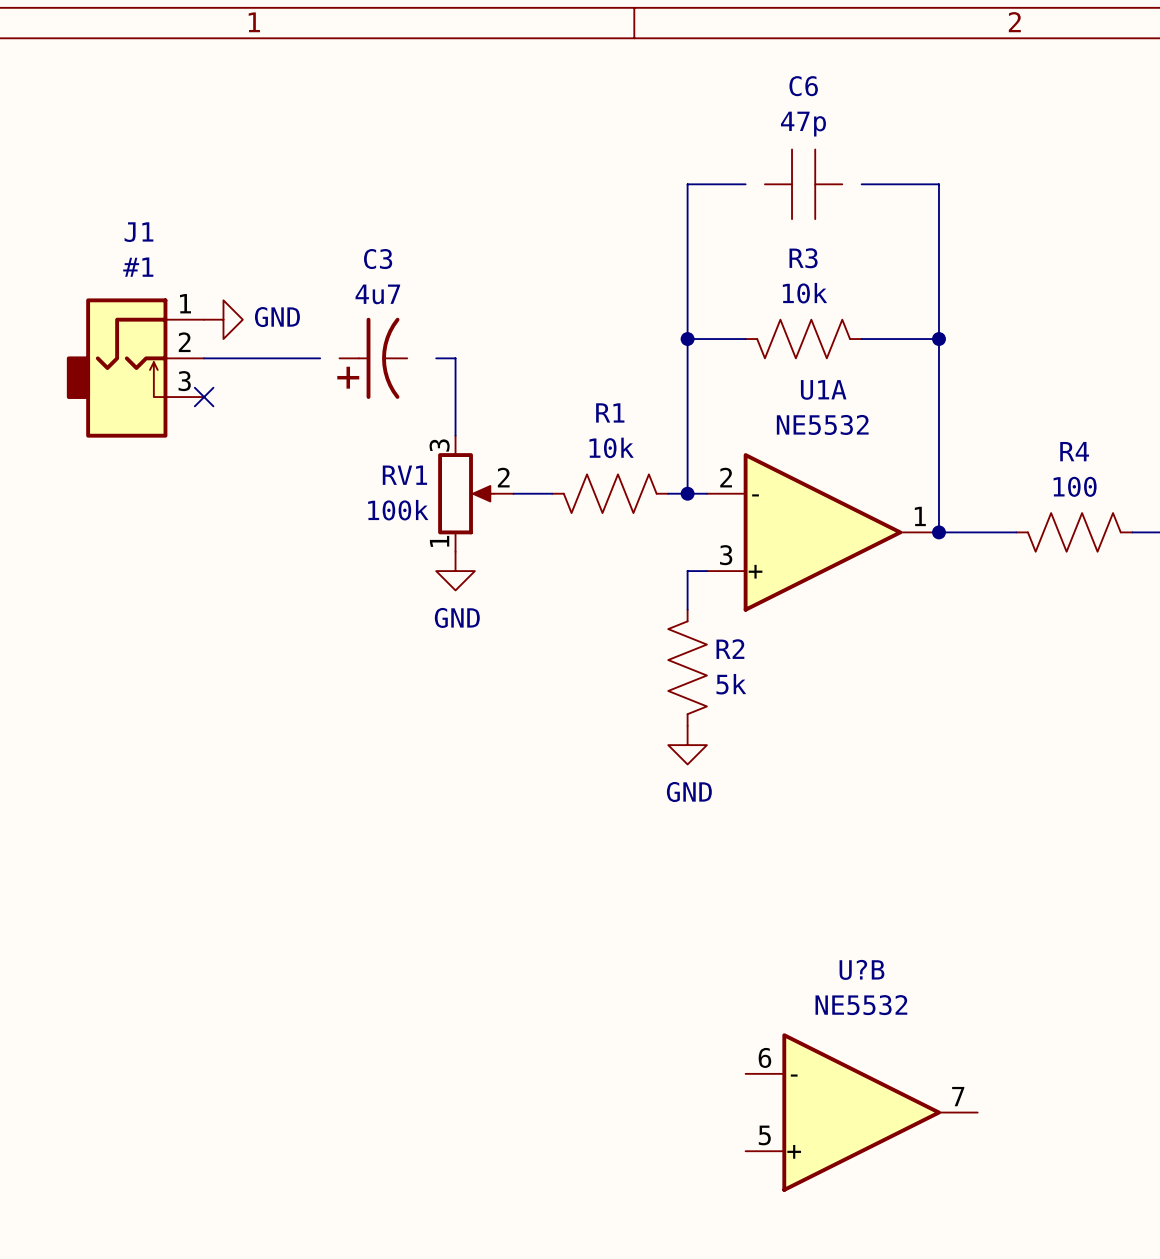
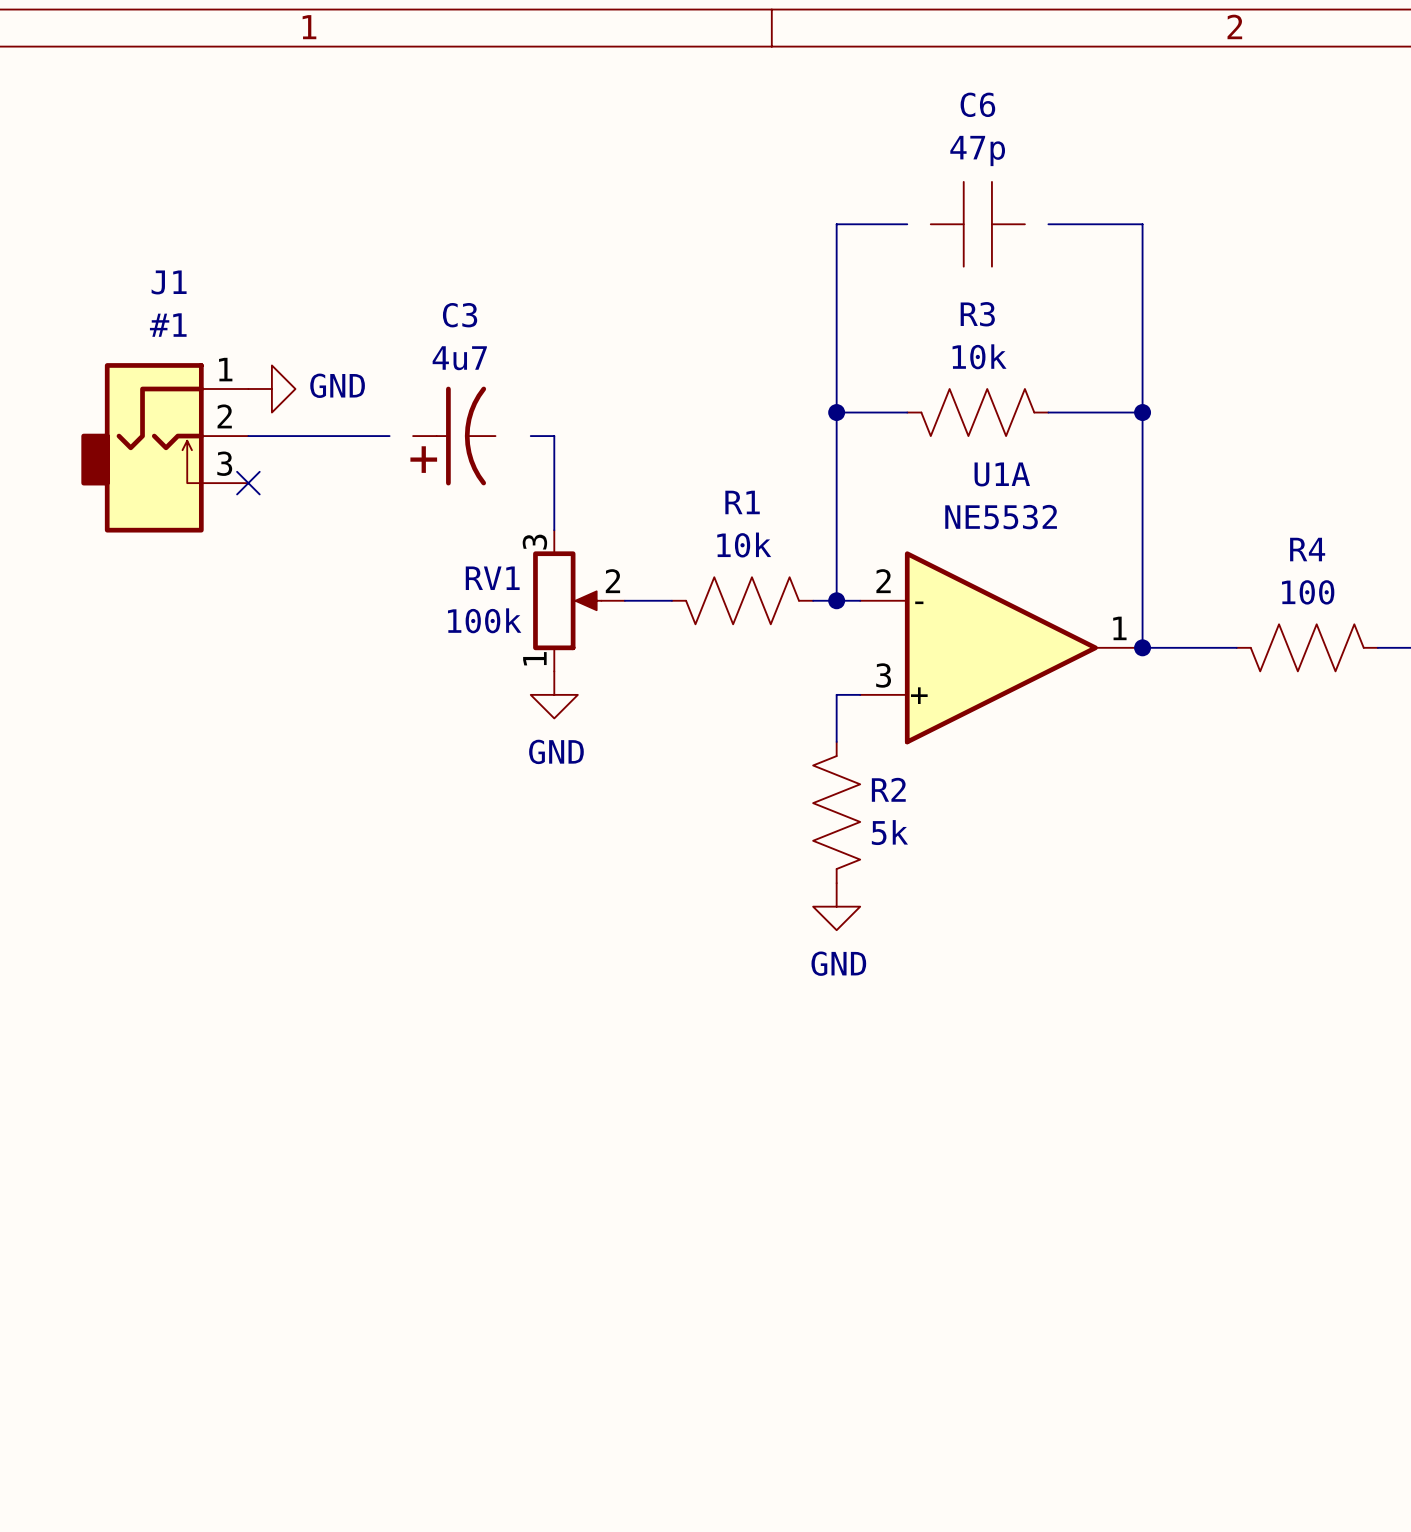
U?B: NE5532 (861, 1112) -> none

